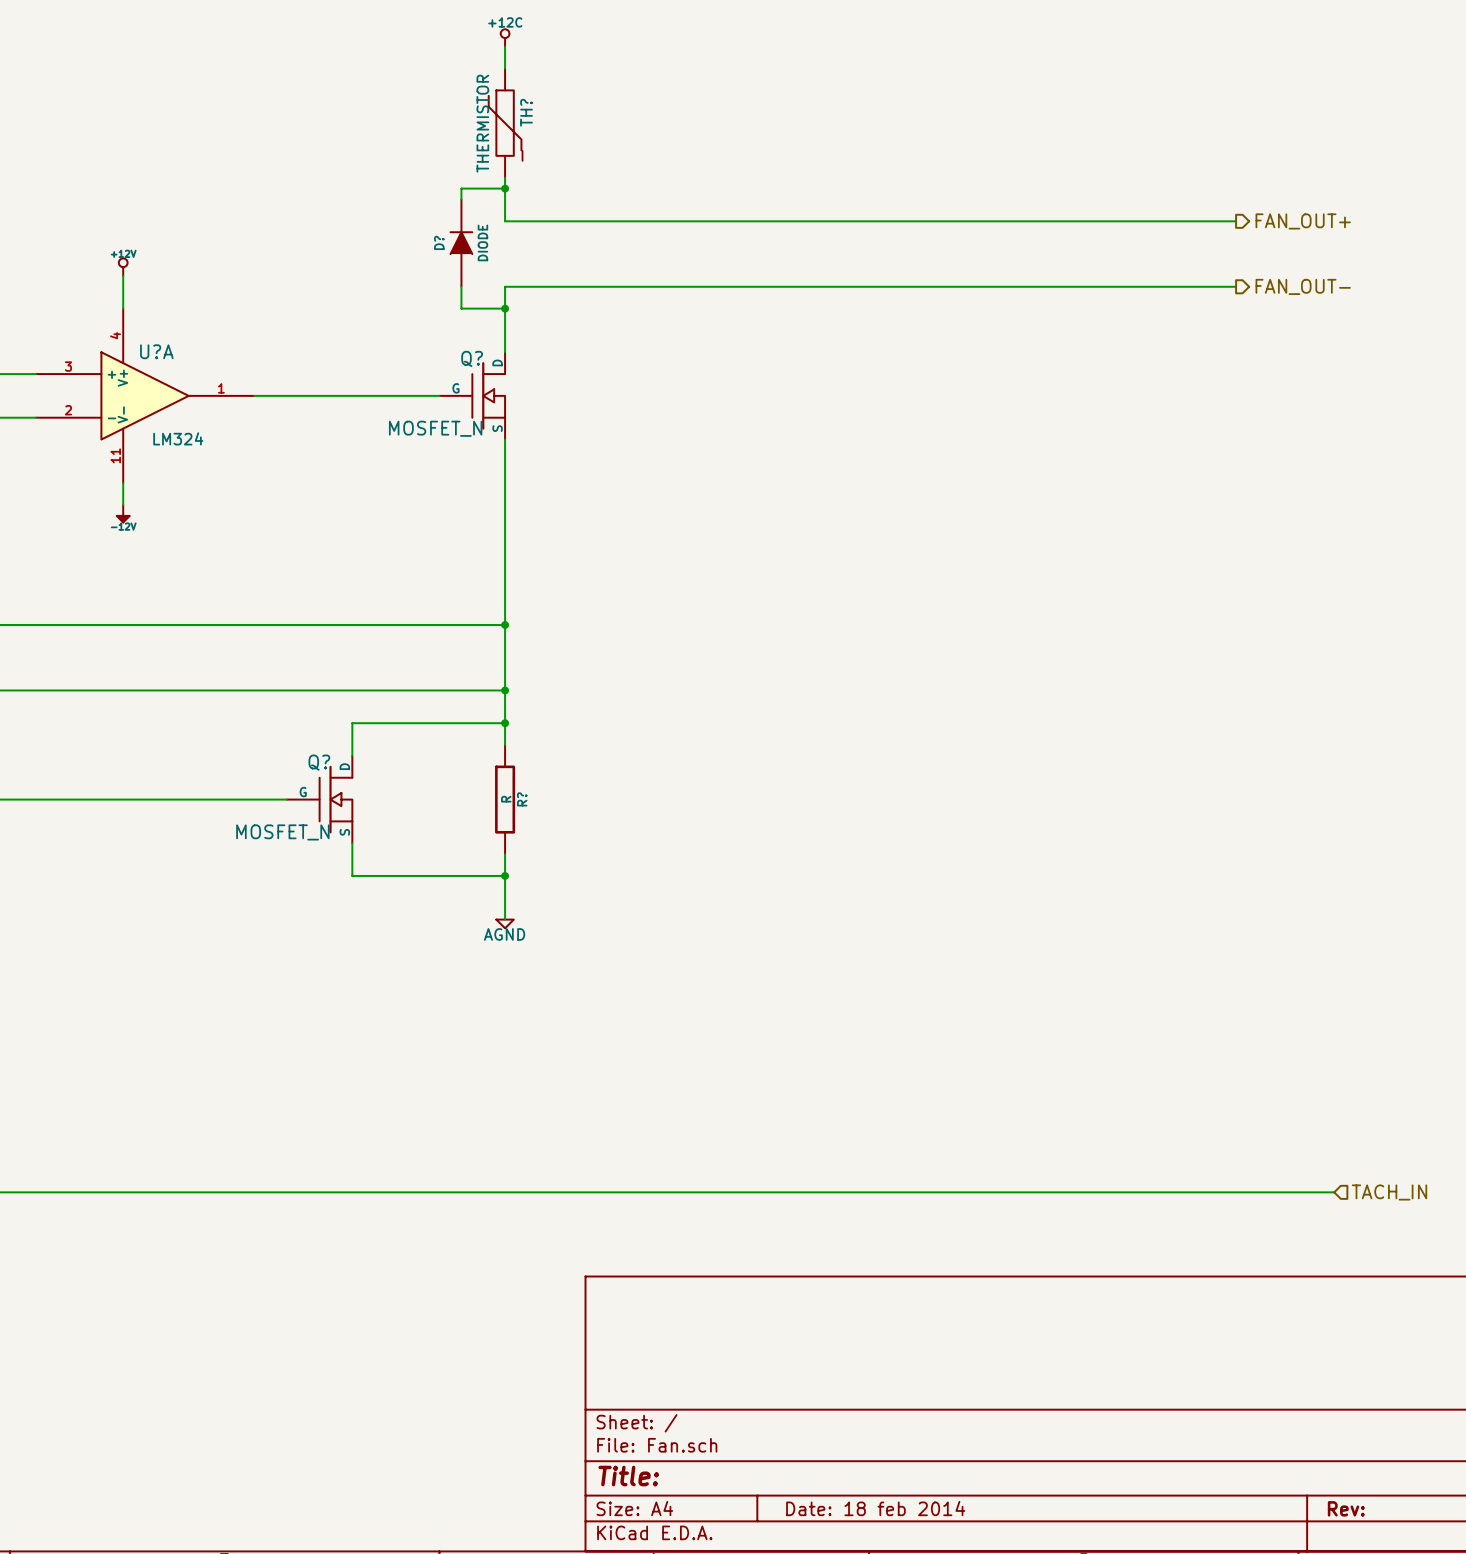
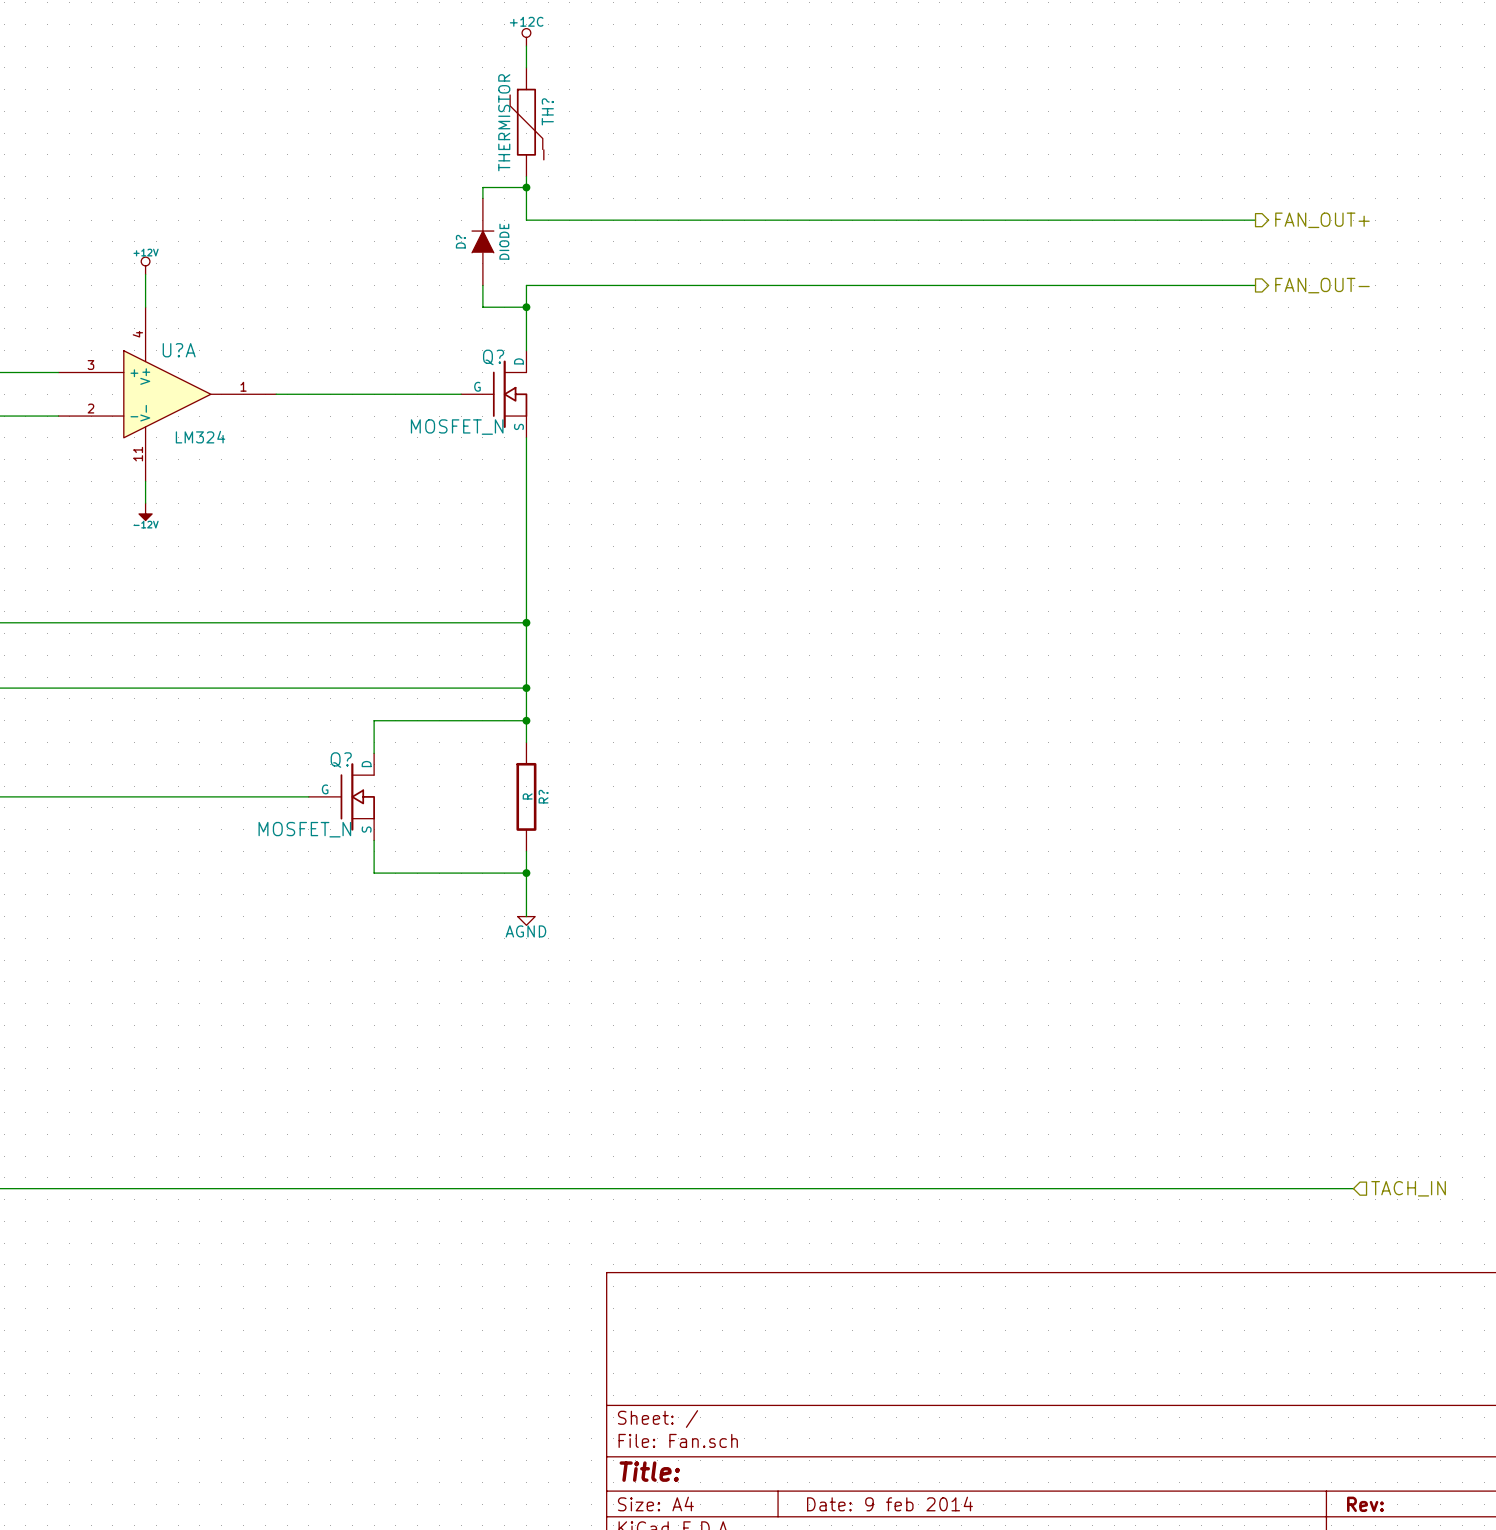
title block: Date: 18 feb 2014 (875, 1508) -> Date: 9 feb 2014 (889, 1504)

